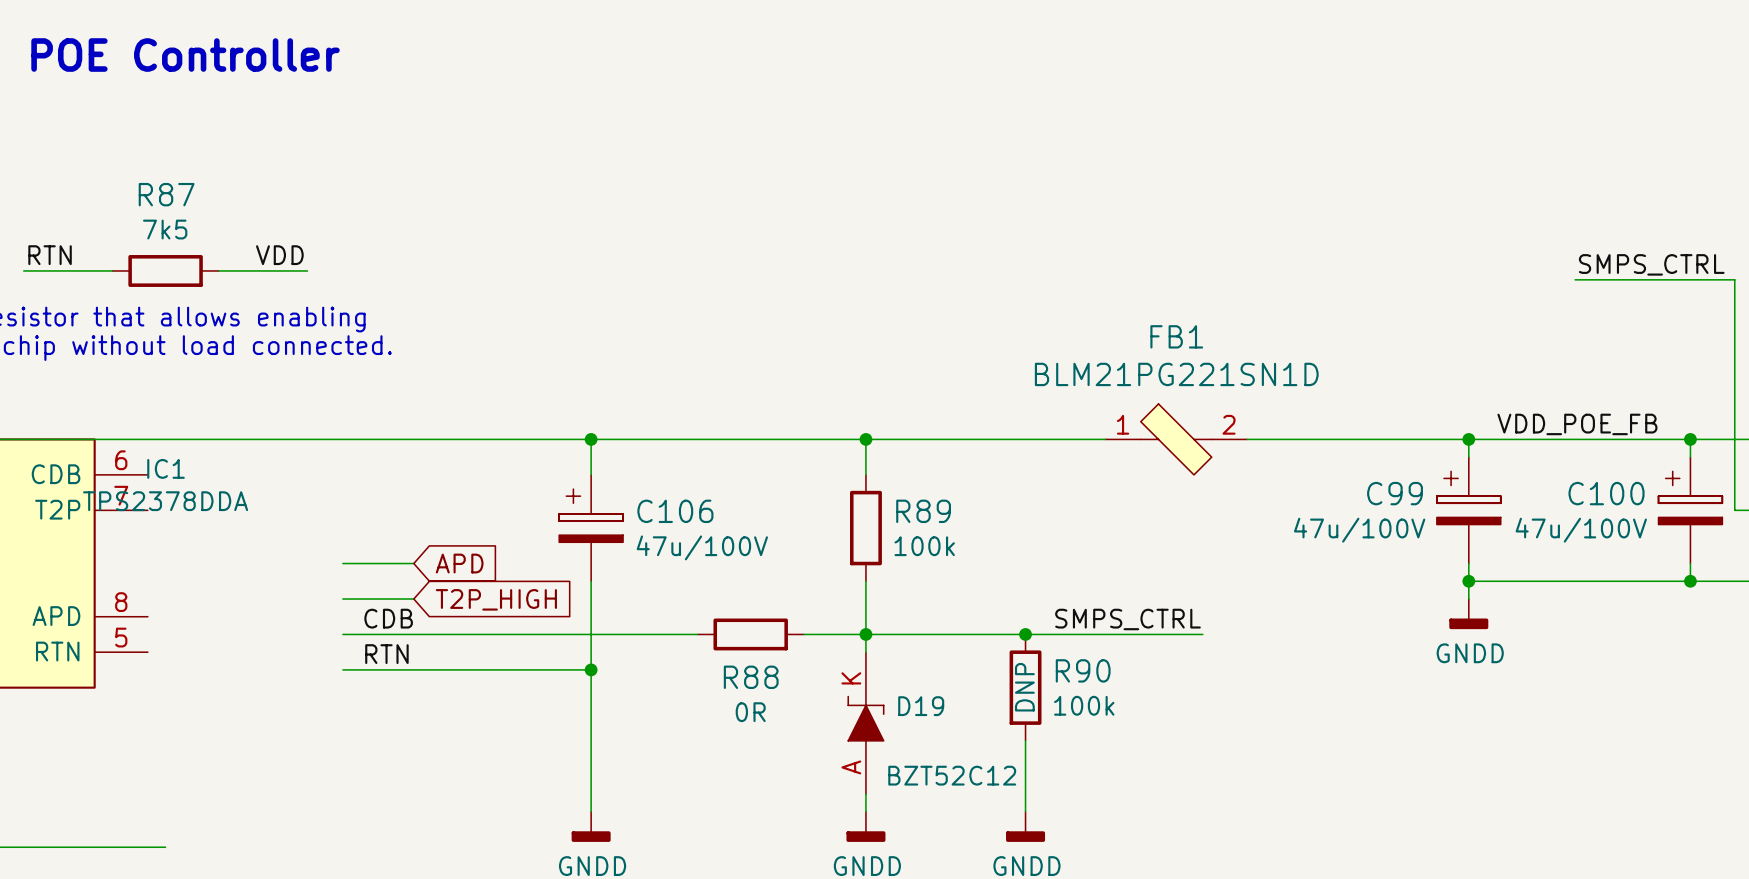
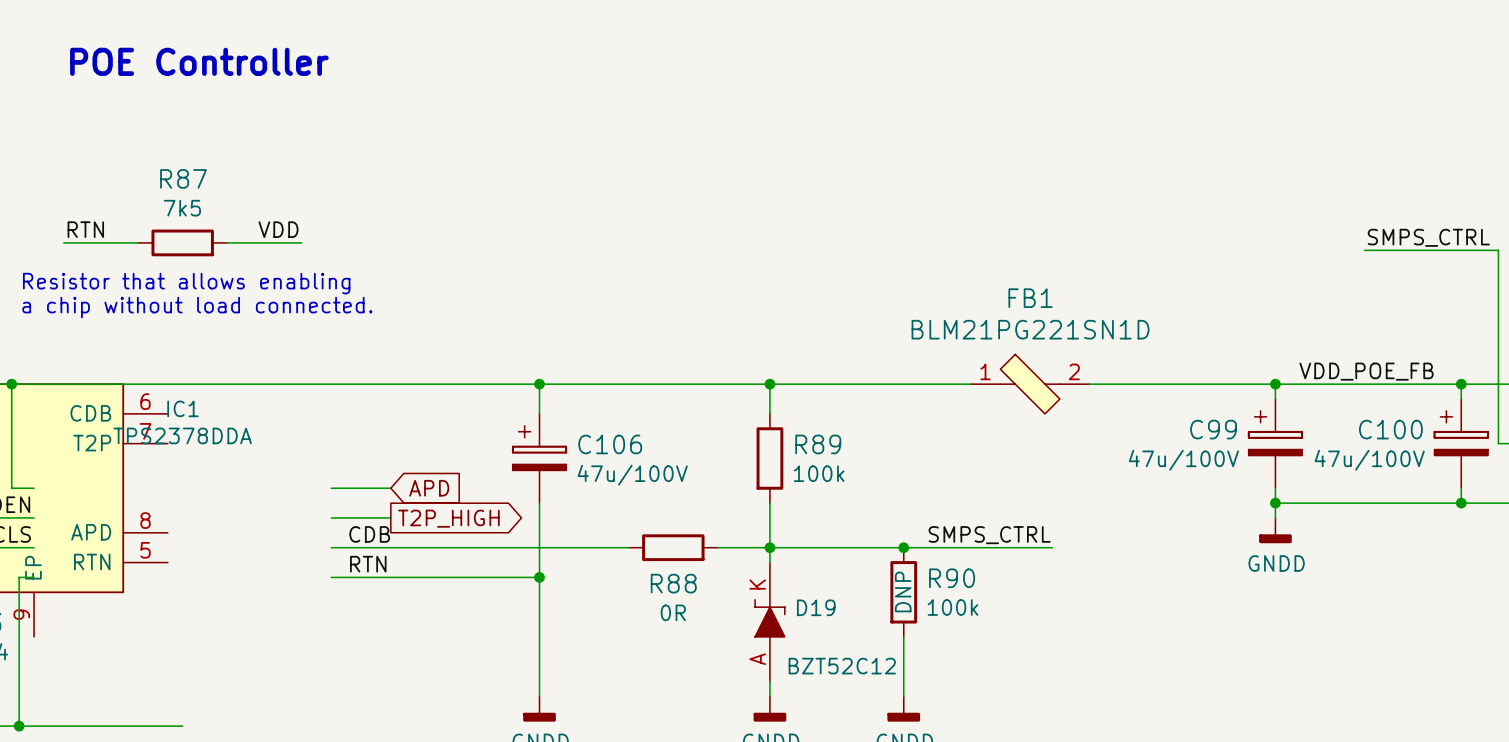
global label shape: input (496, 599) -> output (448, 518)

